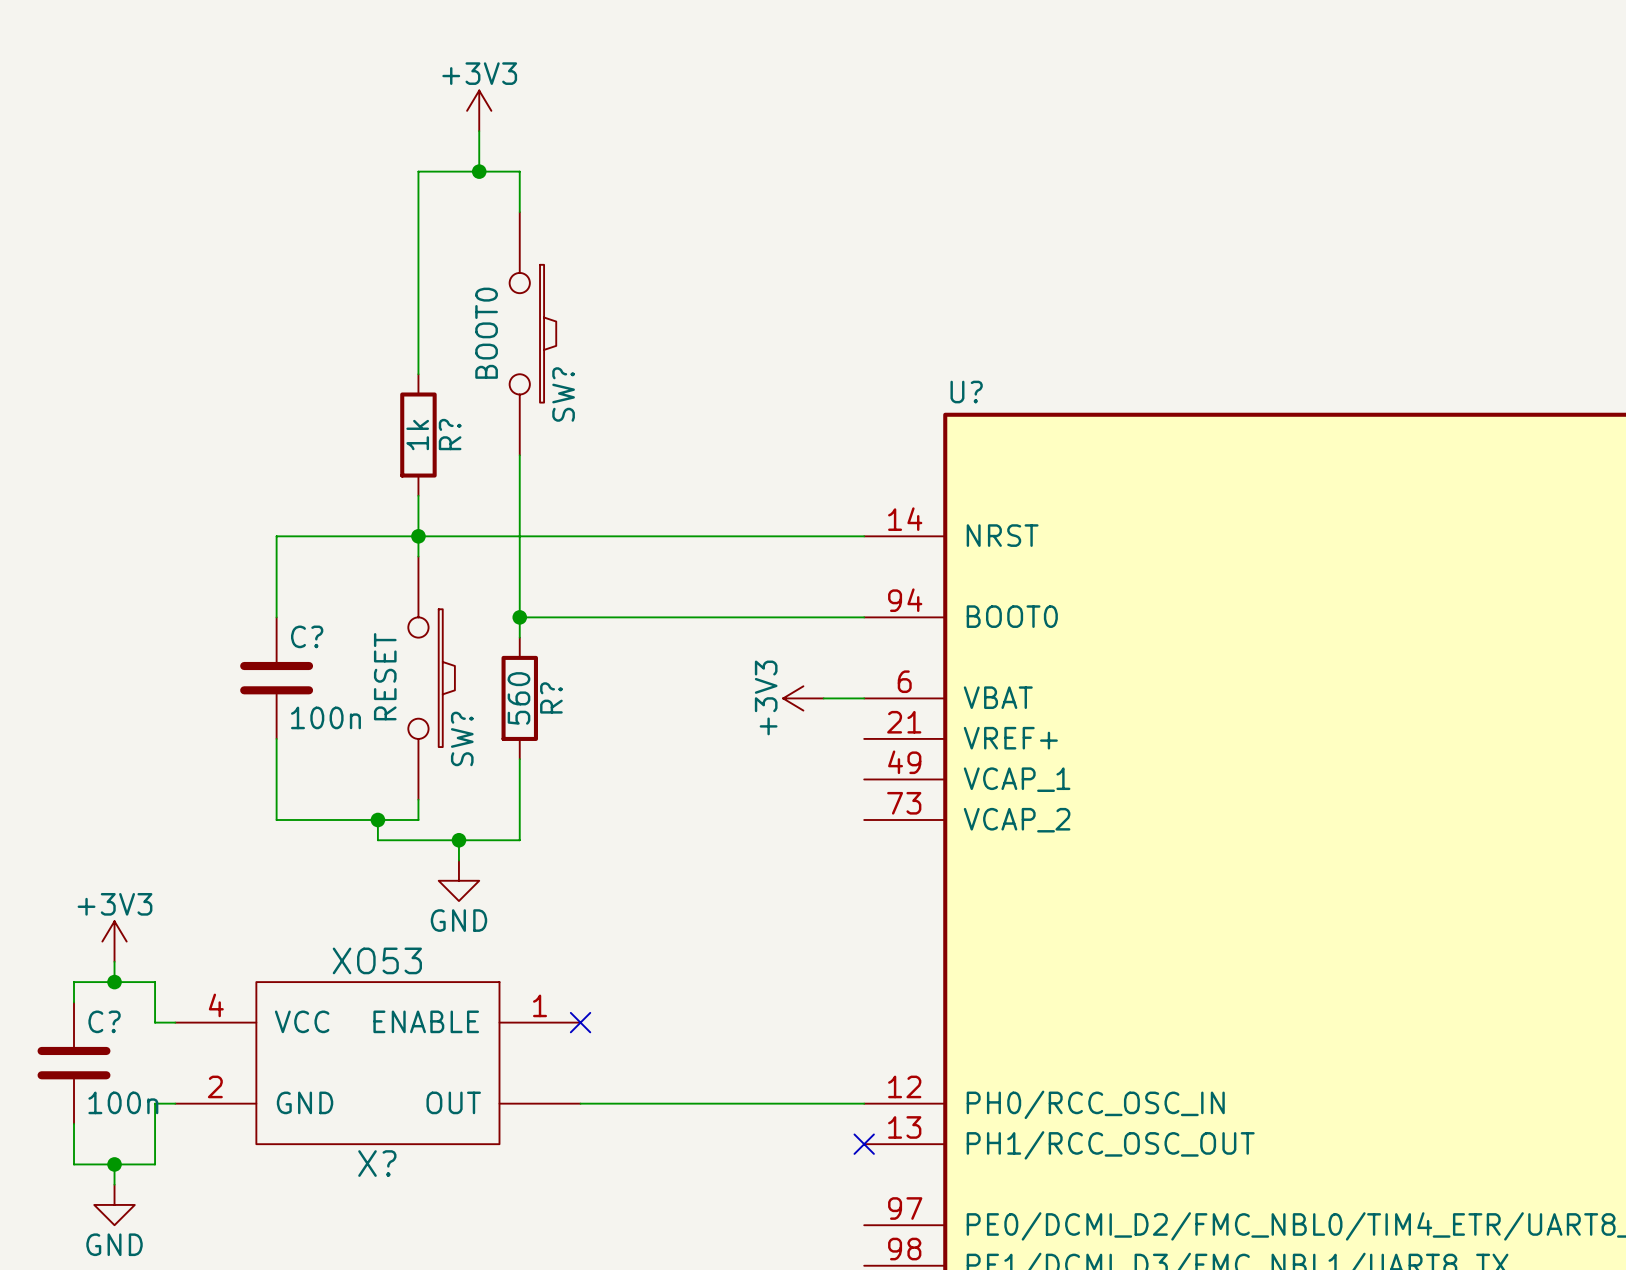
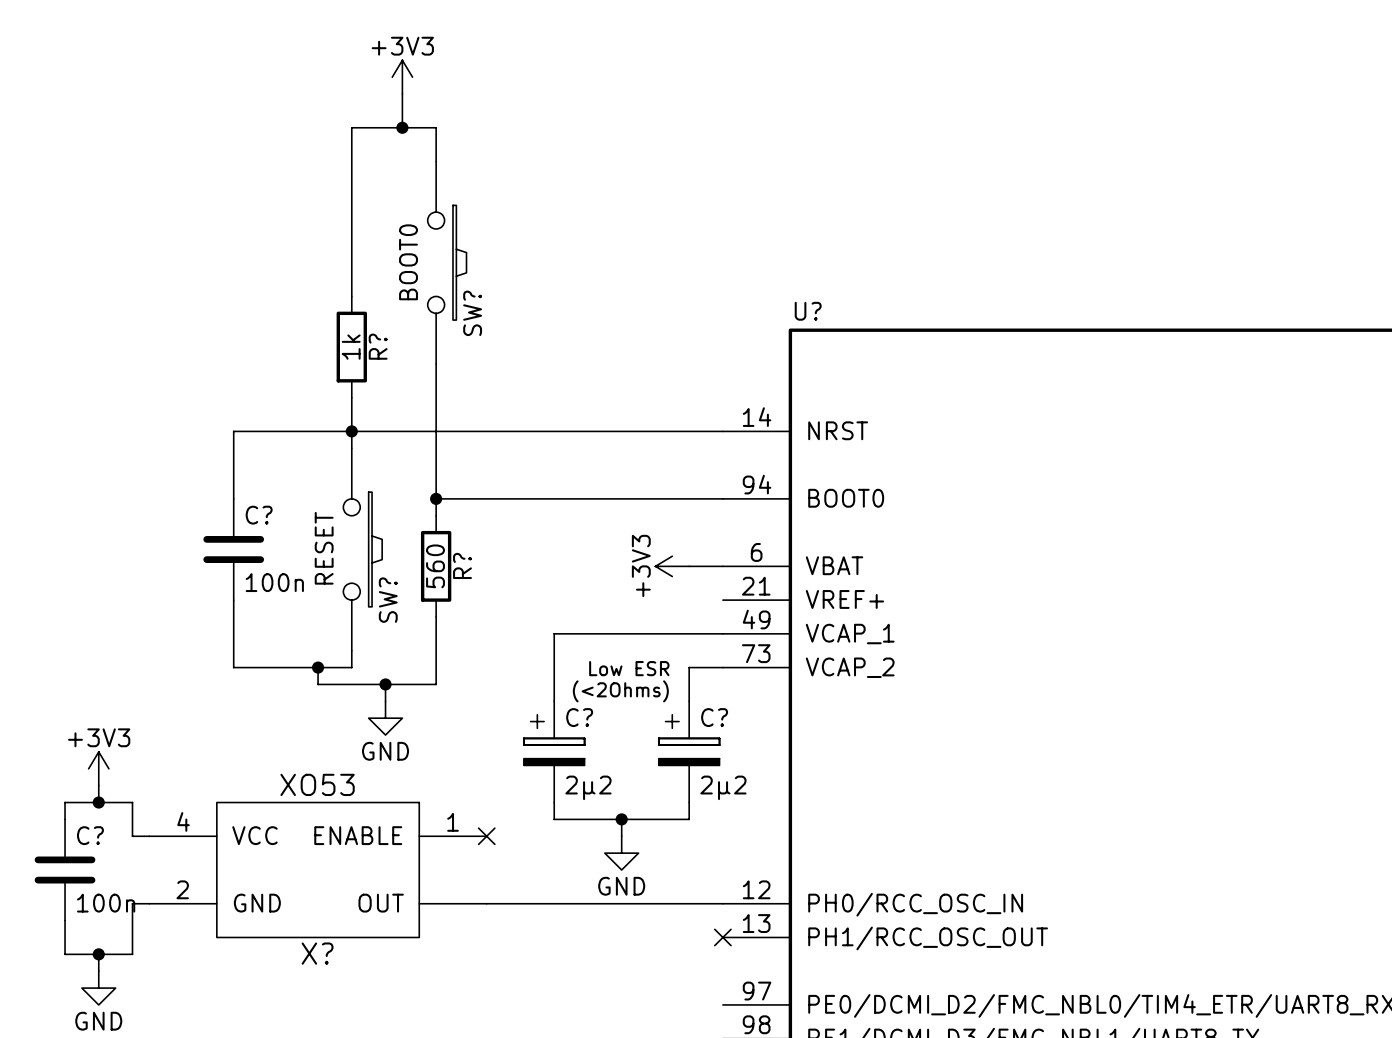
wire: none -> (722, 633) (554, 633) (554, 701)
wire: none -> (722, 667) (689, 667) (689, 701)
text: none -> Low ESR (629, 668)
text: none -> (<2Ohms) (620, 691)
C?: none -> 2µ2 (554, 751)
C?: none -> 2µ2 (689, 751)
wire: none -> (554, 802) (554, 819) (689, 819) (689, 802)
wire: none -> (621, 819) (621, 836)
junction: none -> (621, 819)
power symbol: none -> GND (621, 853)

